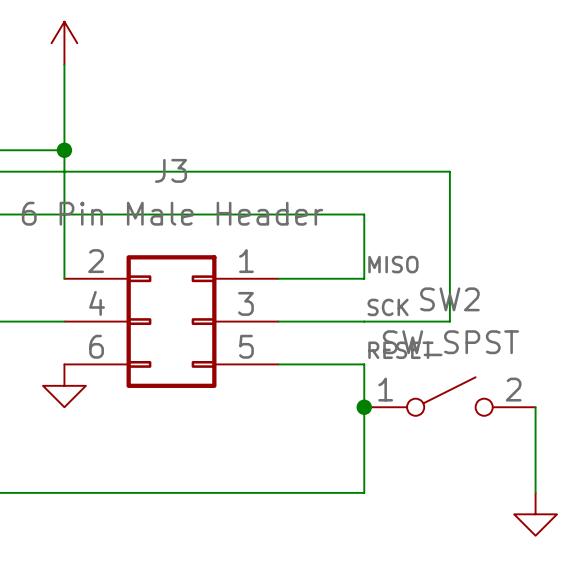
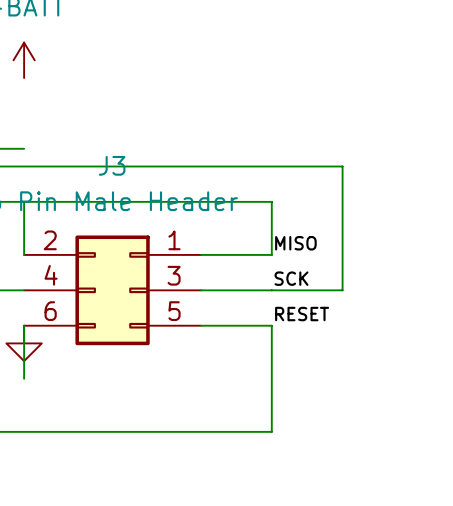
wire: (64, 64) (64, 214) -> none
junction: (64, 150) -> none
wire: none -> (24, 325) (24, 378)
SW2: SW_SPST (449, 396) -> none
junction: (364, 407) -> none
wire: (535, 407) (535, 492) -> none
power symbol: (535, 514) -> none

